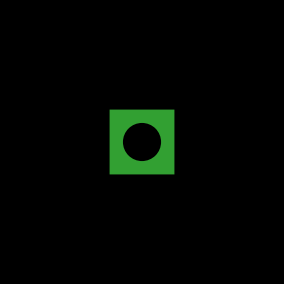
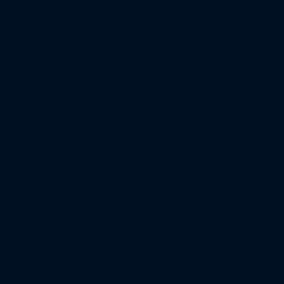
part: (142, 142) -> none

